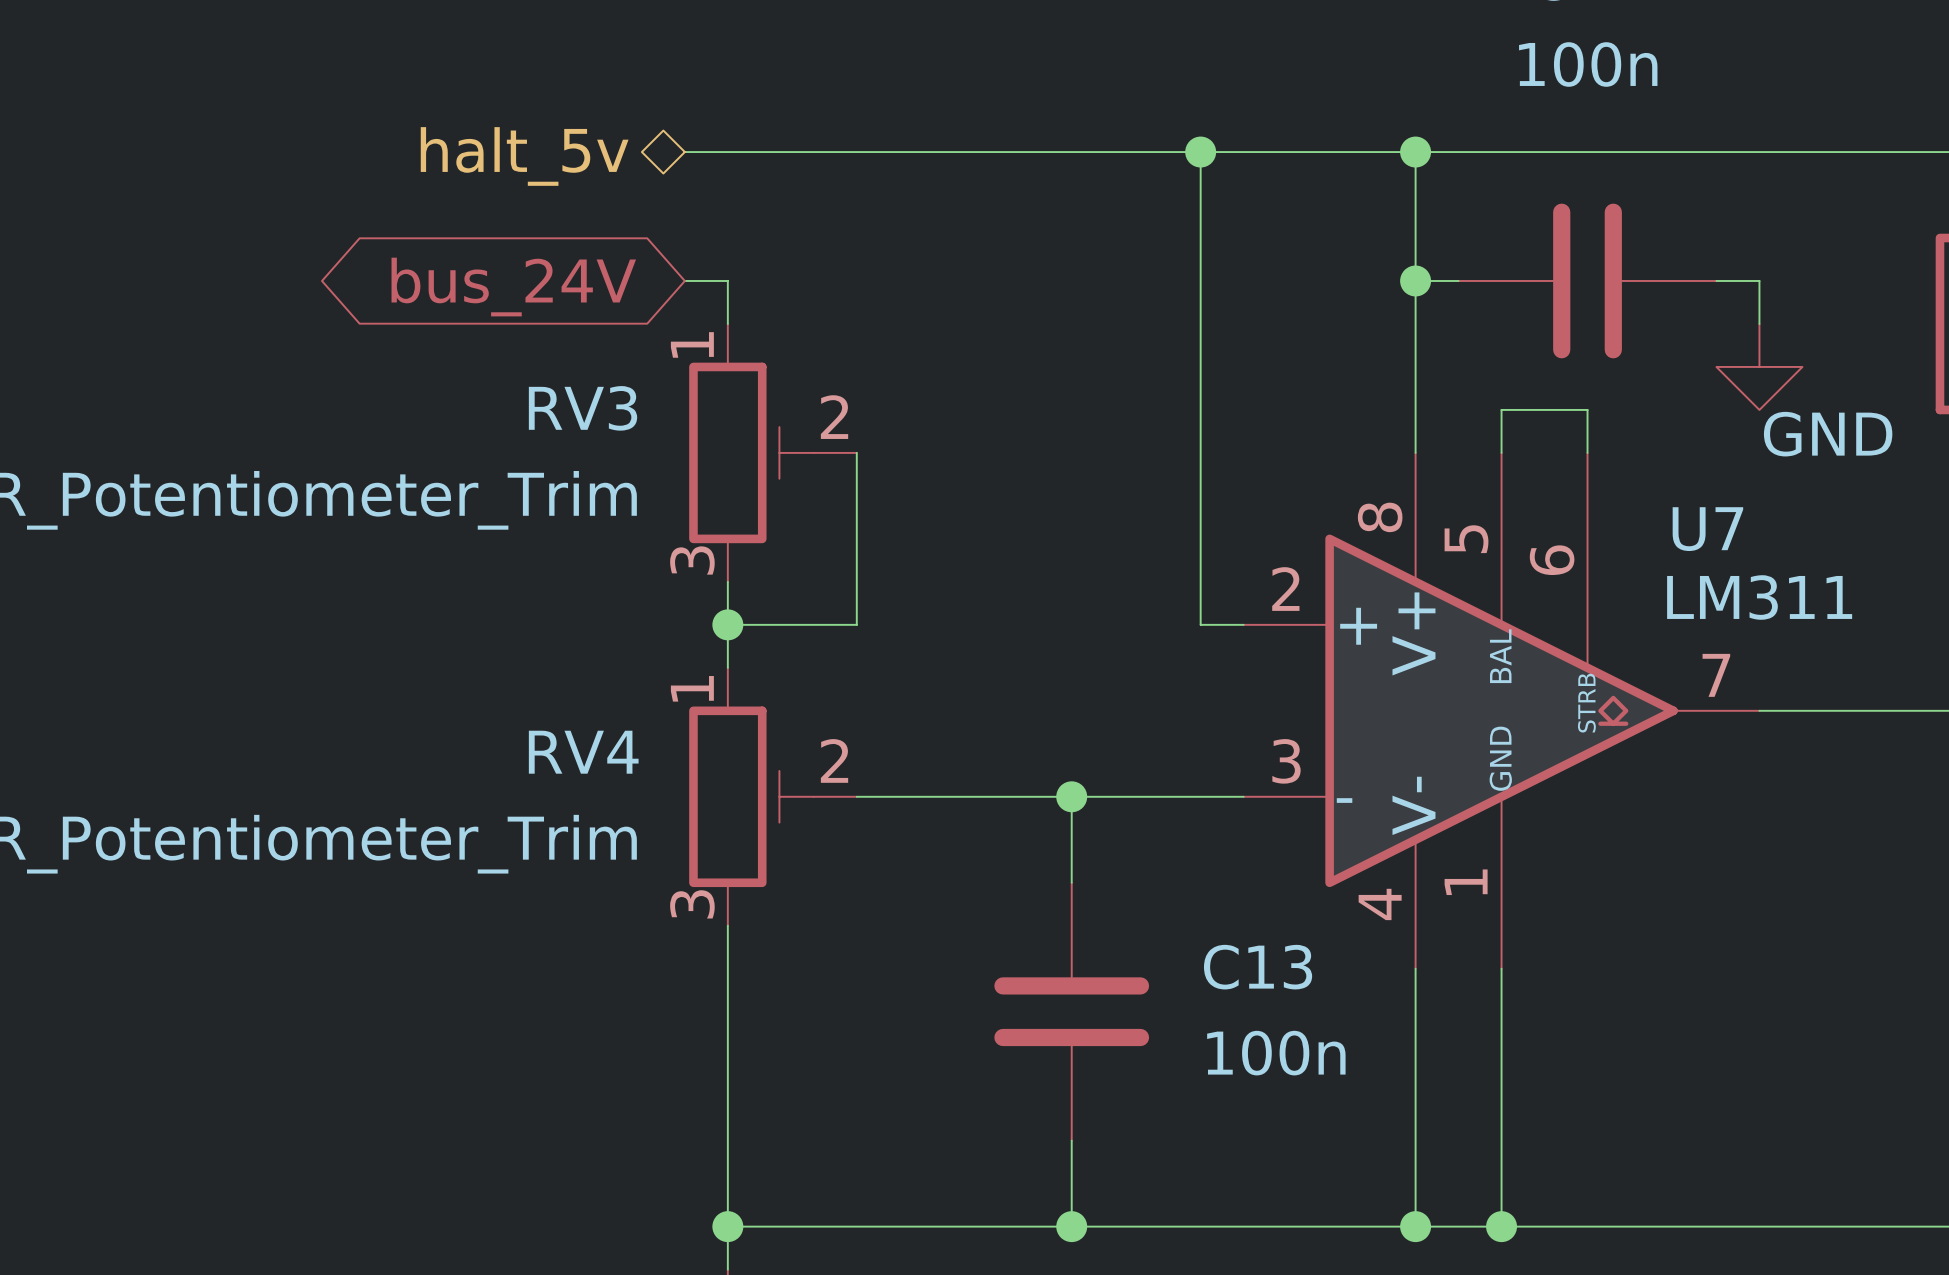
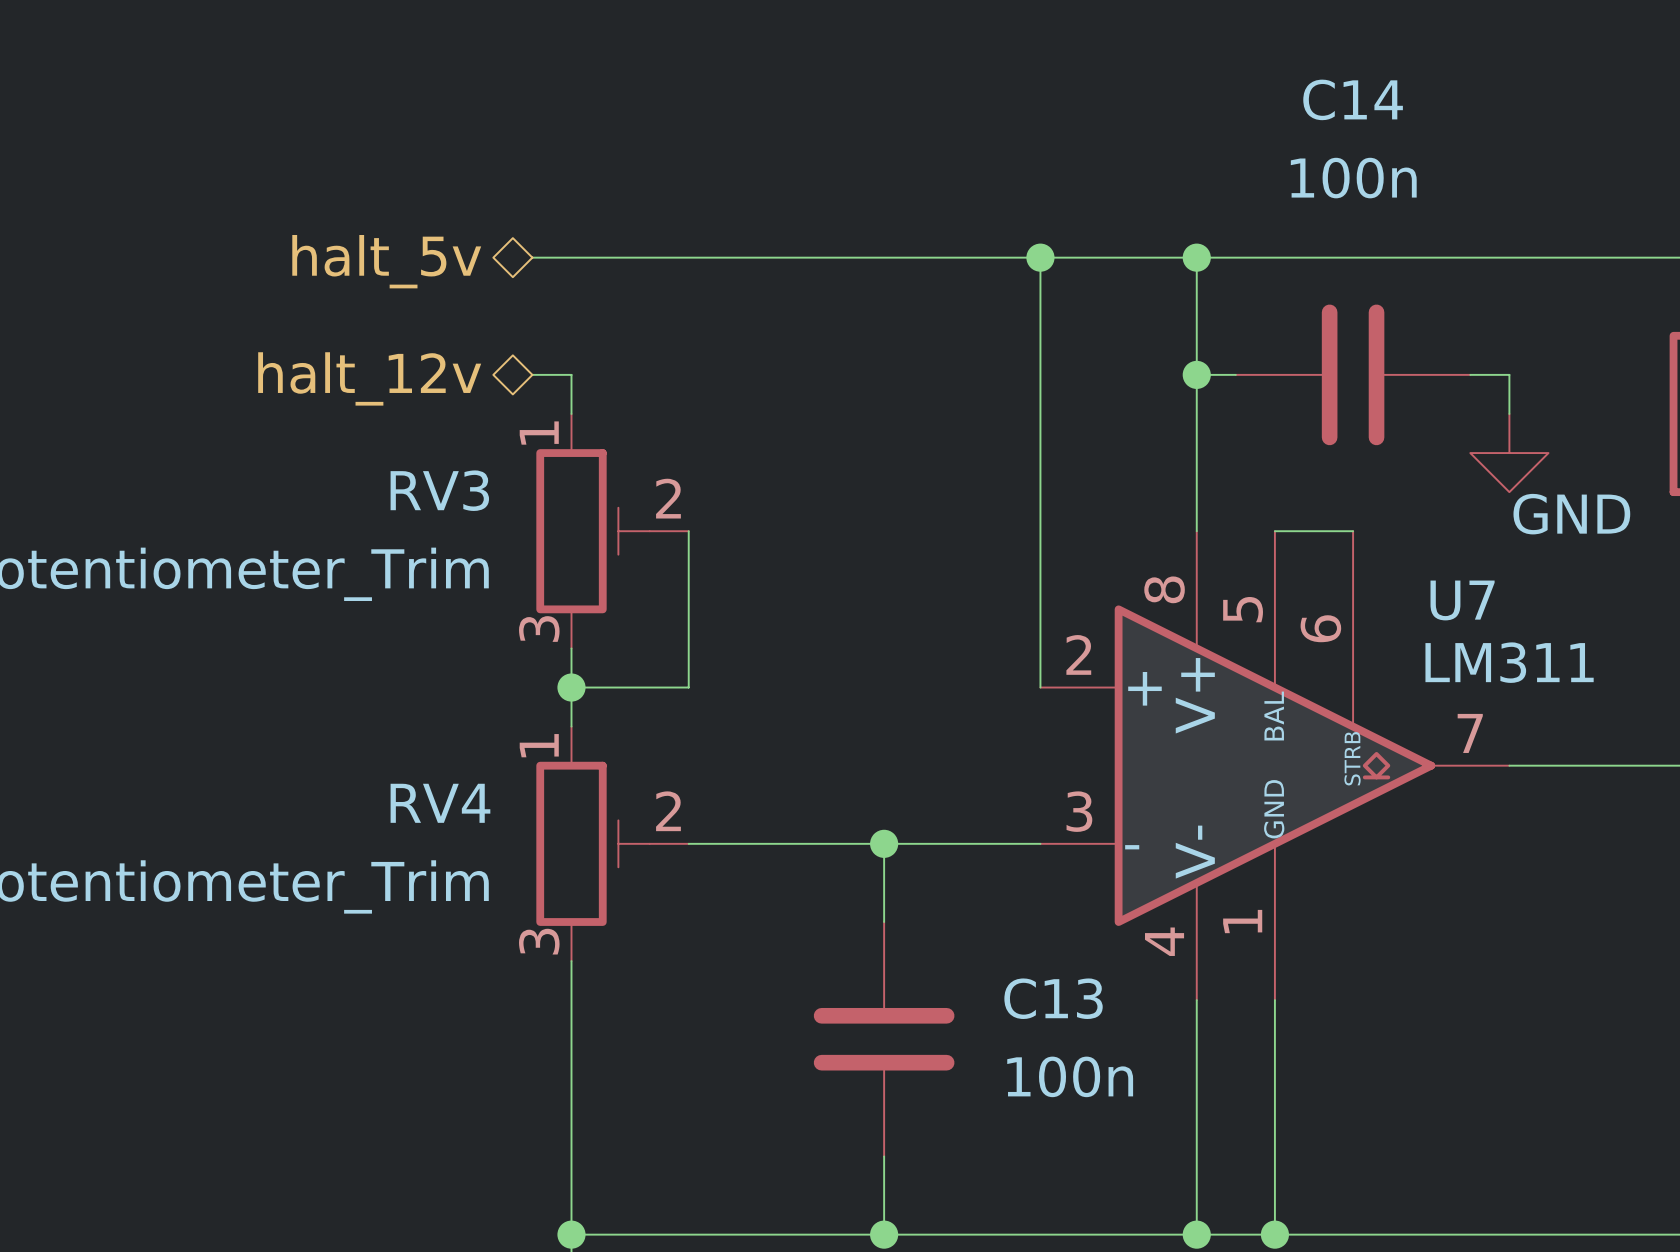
wire: (1200, 152) (1200, 624) (1243, 624) -> (1040, 257) (1040, 687)
junction position: (1200, 152) -> (1040, 257)
hierarchical label: none -> halt_12v (369, 378)
global label: bus_24V (513, 287) -> none
wire: (1501, 452) (1501, 409) (1587, 409) (1587, 452) -> (1274, 531) (1353, 531)

